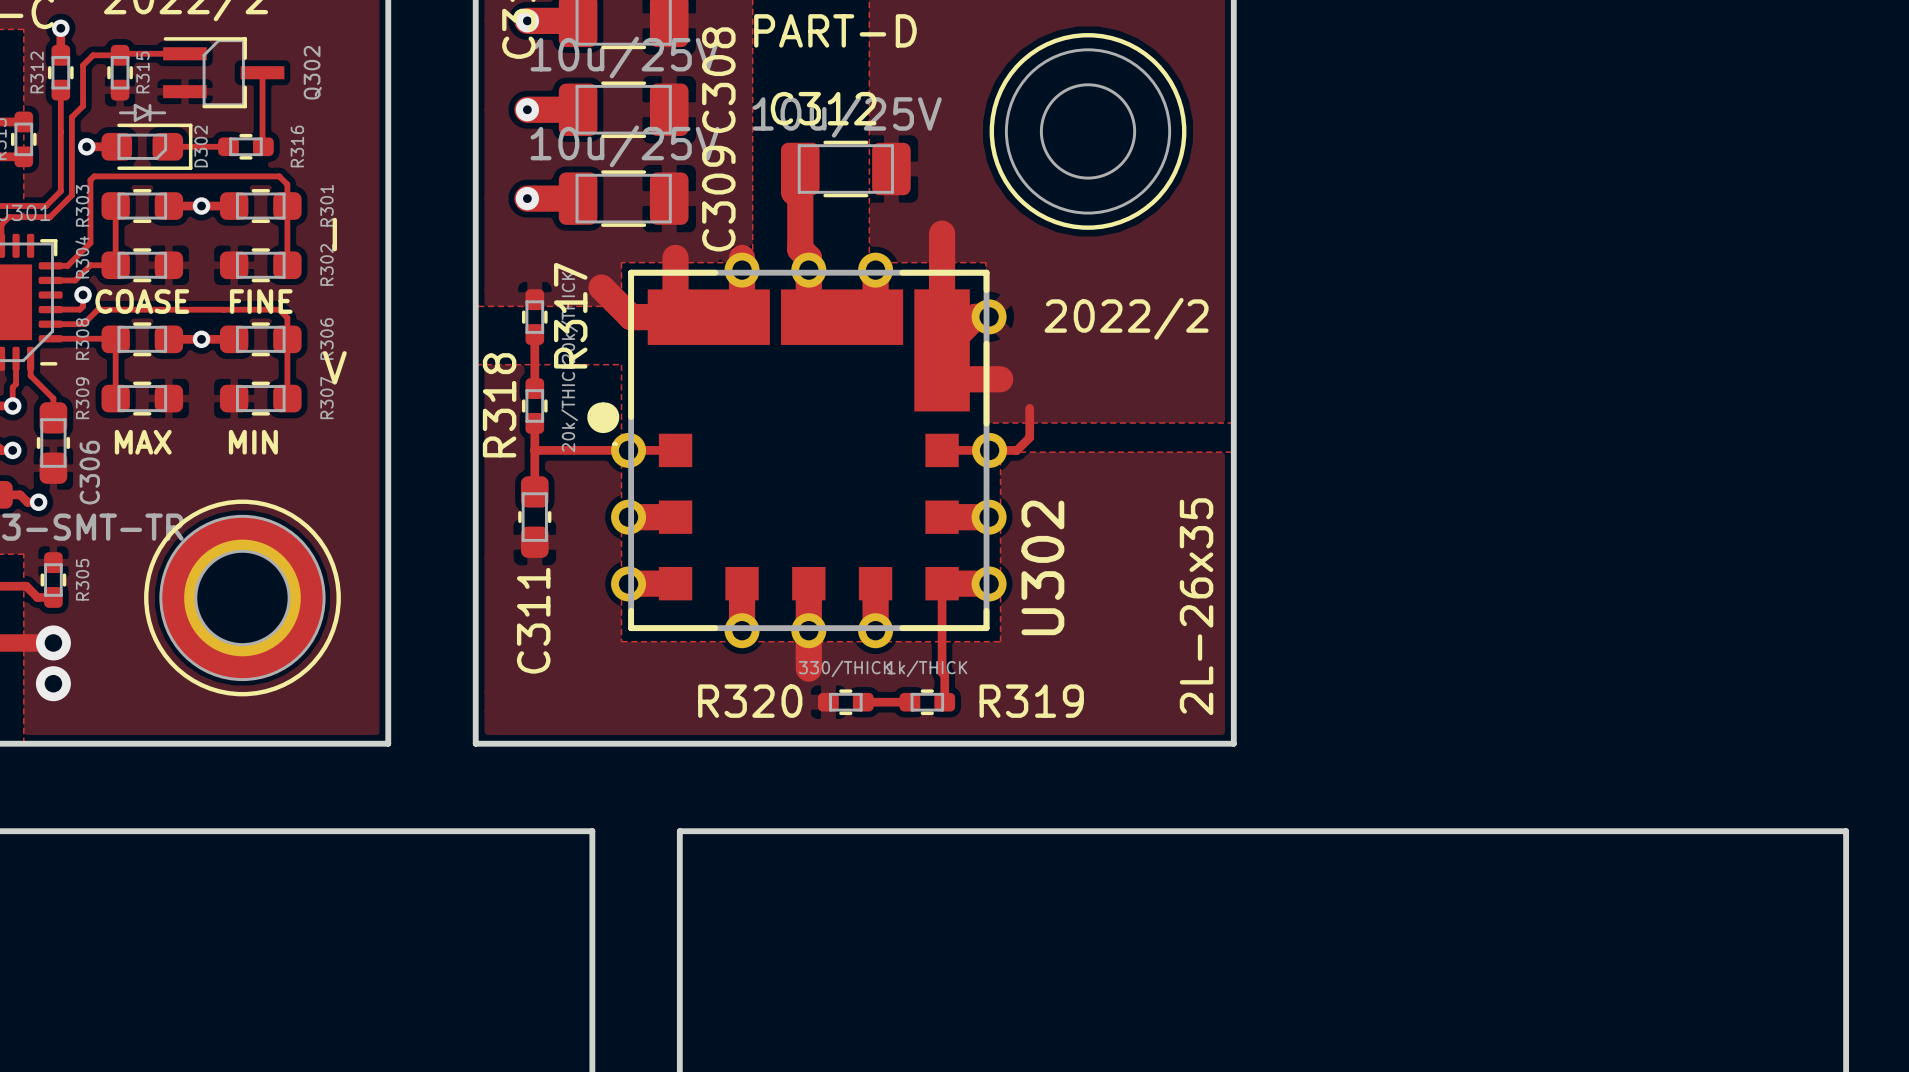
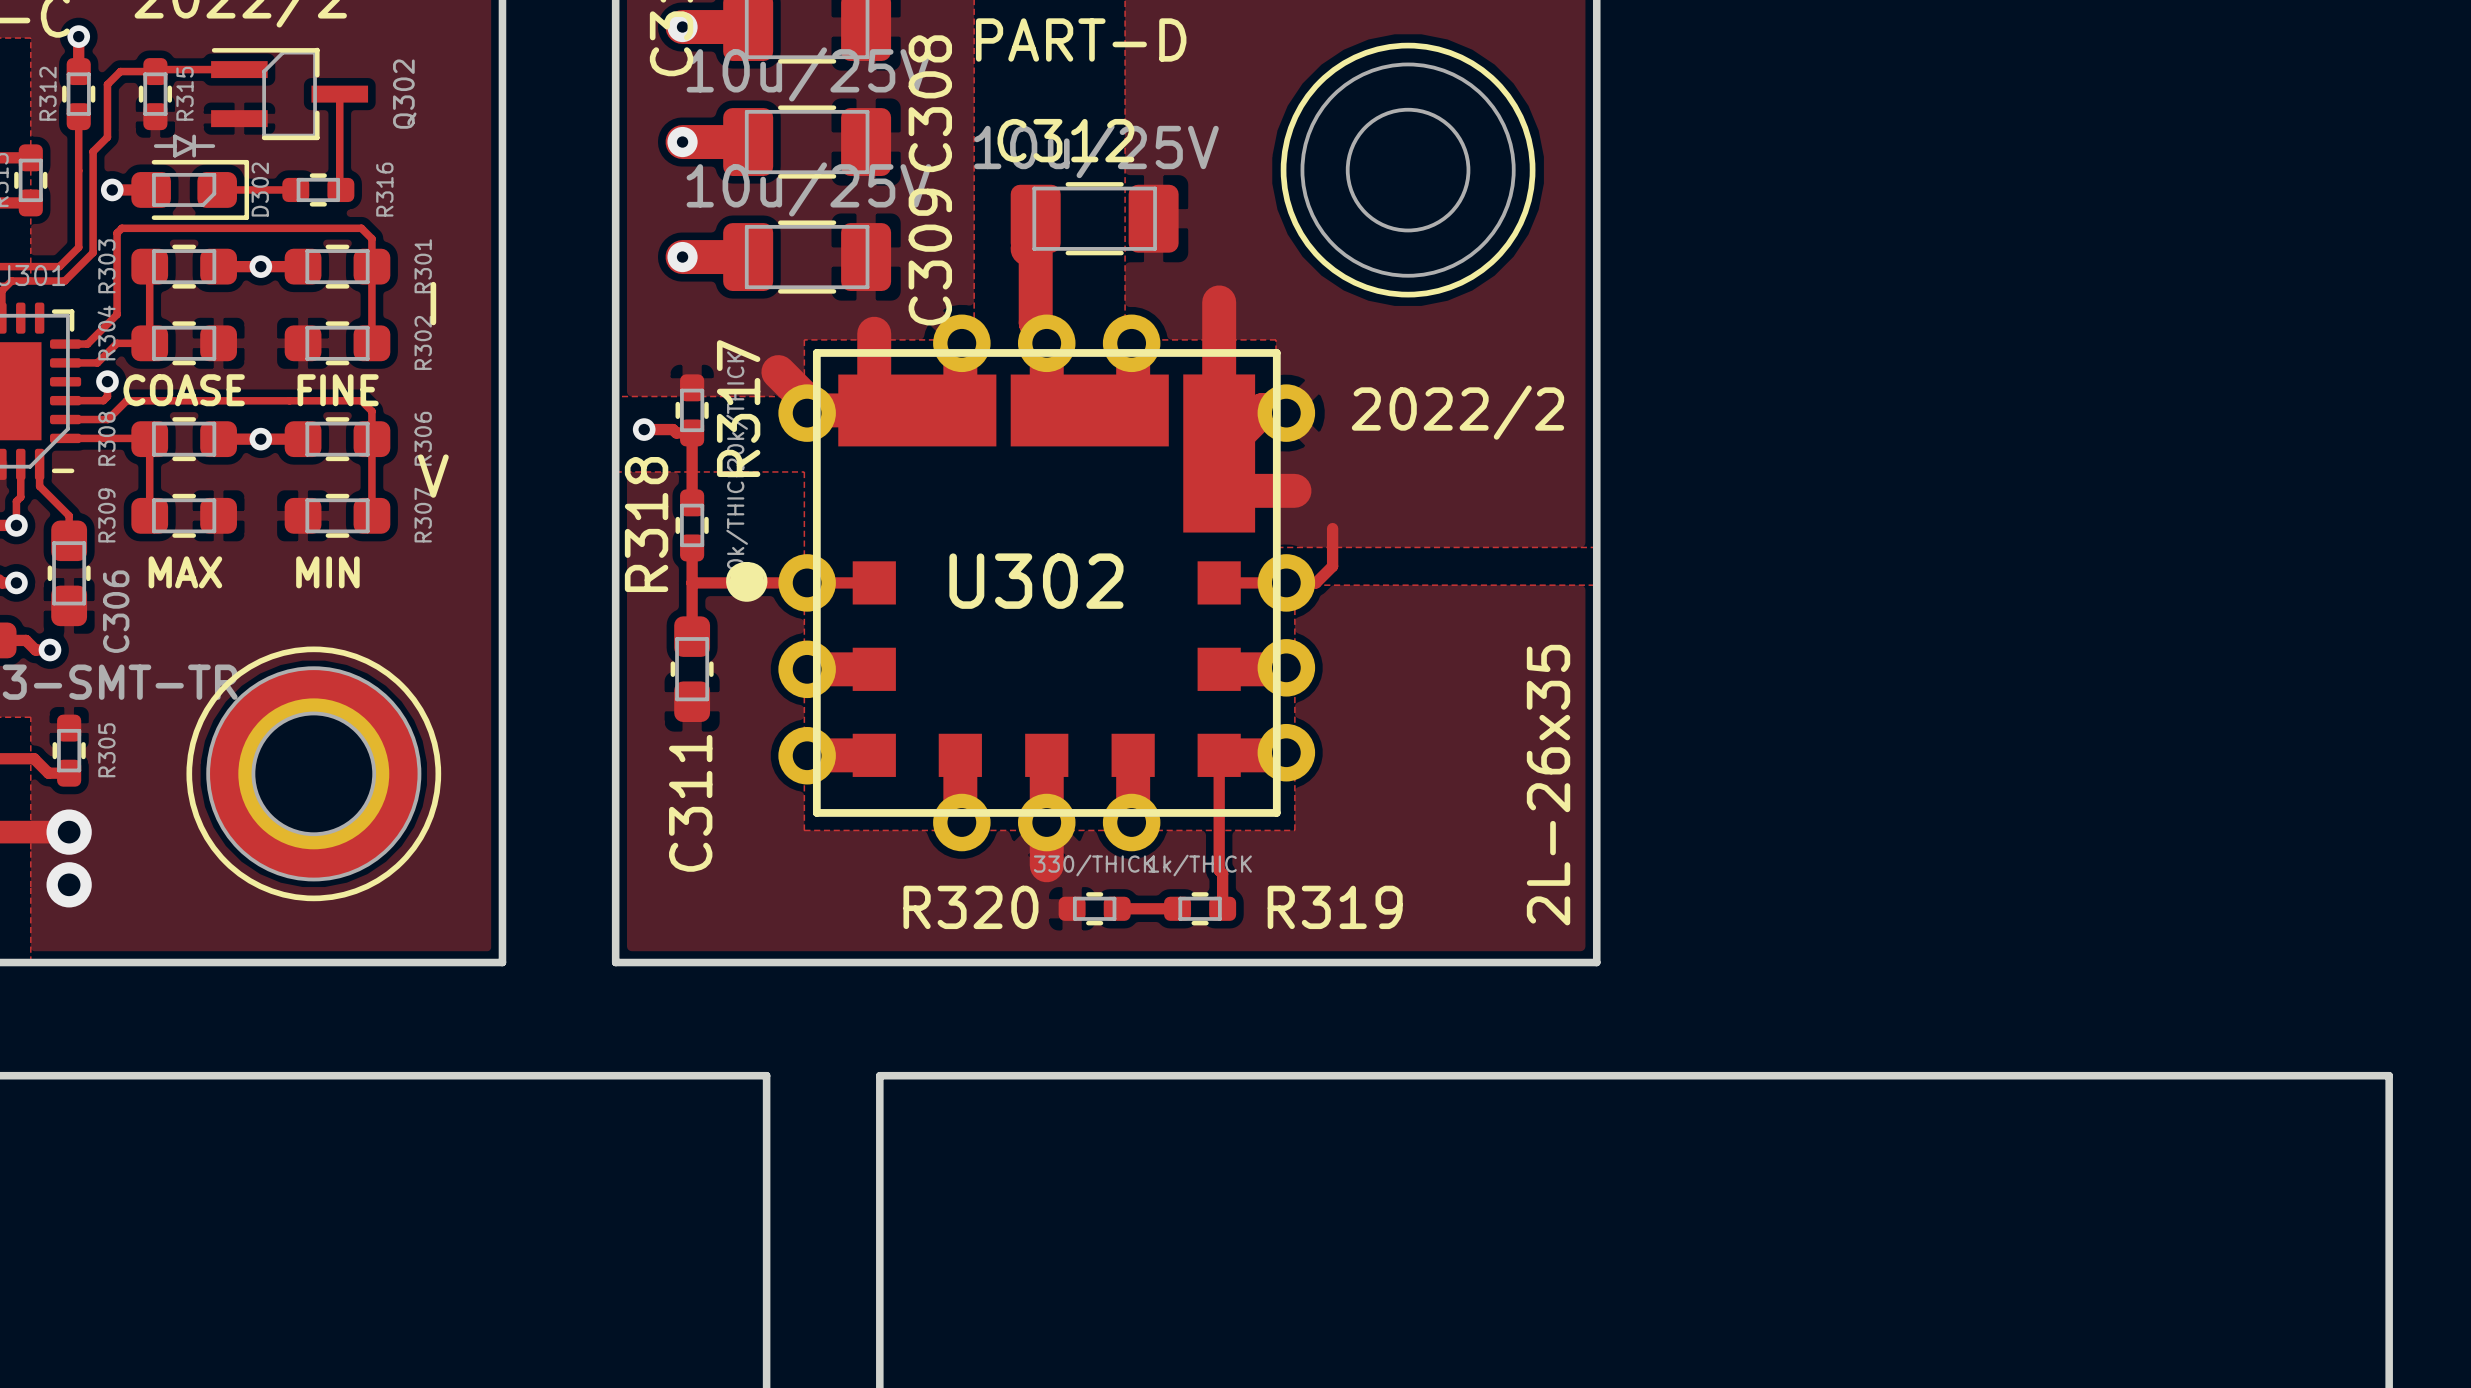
U302 footprint: [587, 252, 1008, 649] -> [726, 314, 1316, 852]
track: none -> (644, 429) (672, 429) (676, 432) (692, 432)
via: none -> (644, 429)
U302 name position: U302 (1042, 567) -> U302 (1036, 581)

